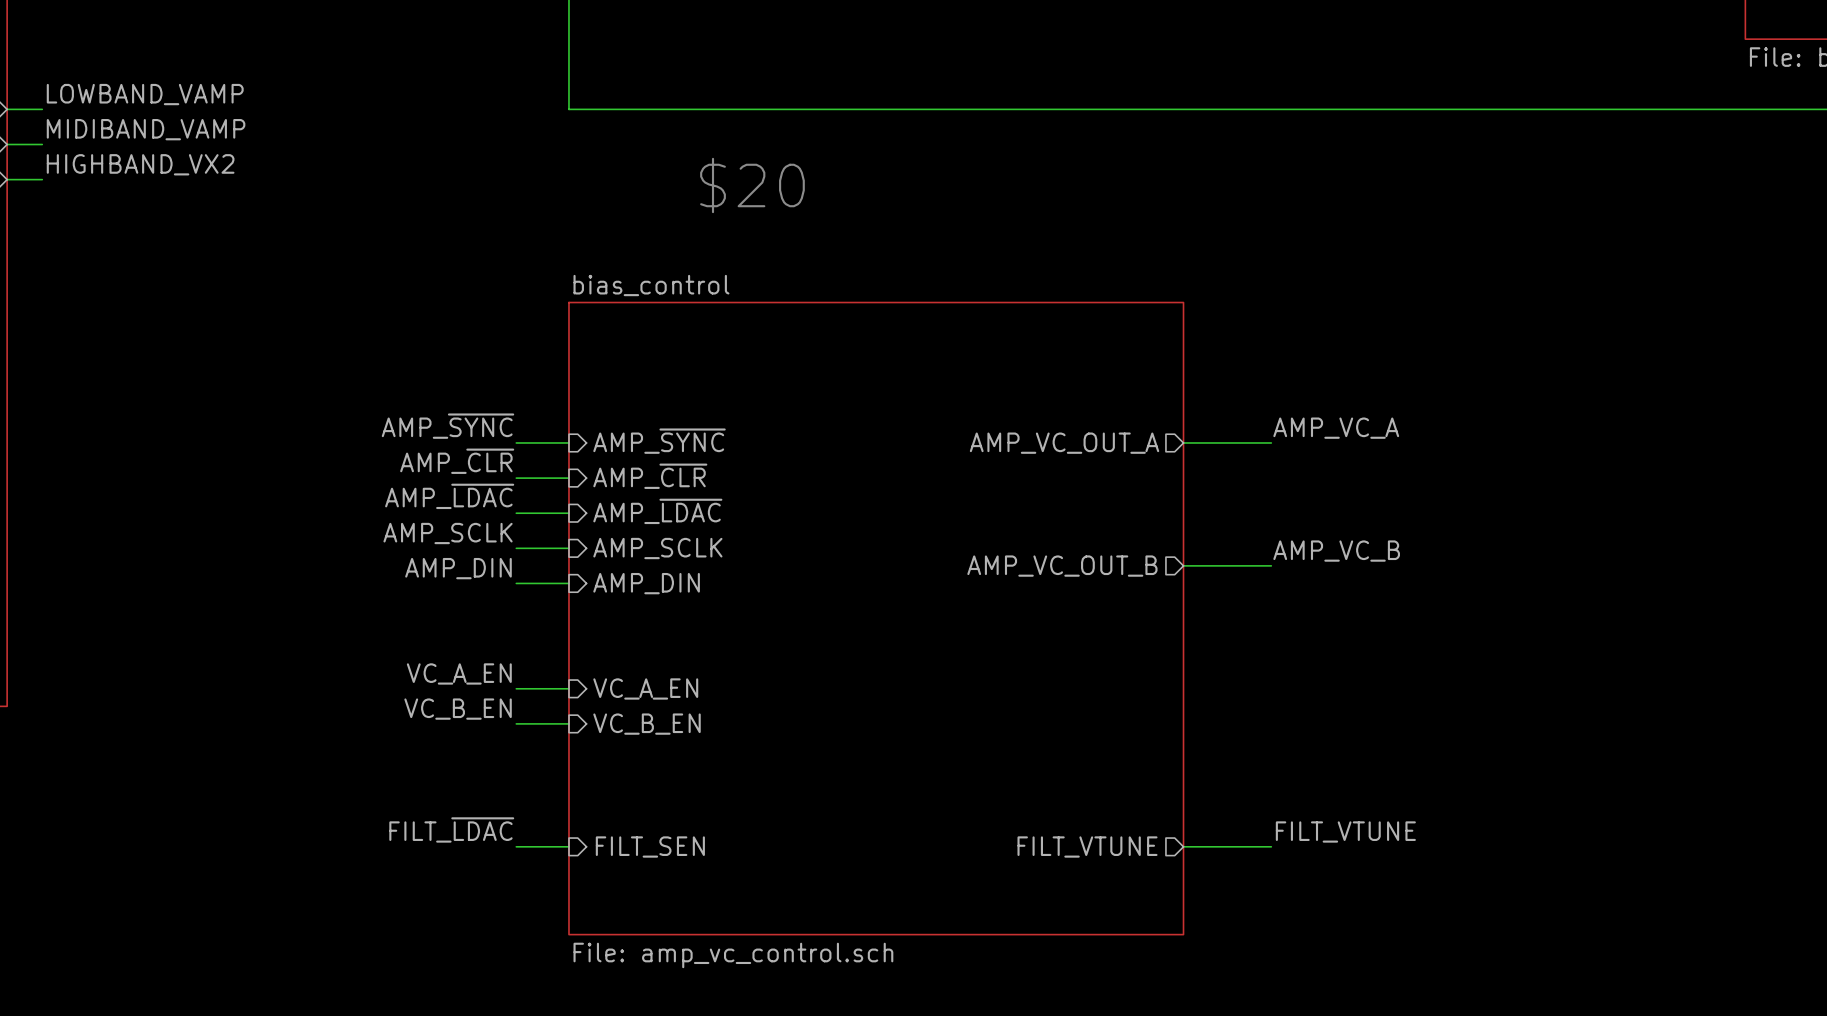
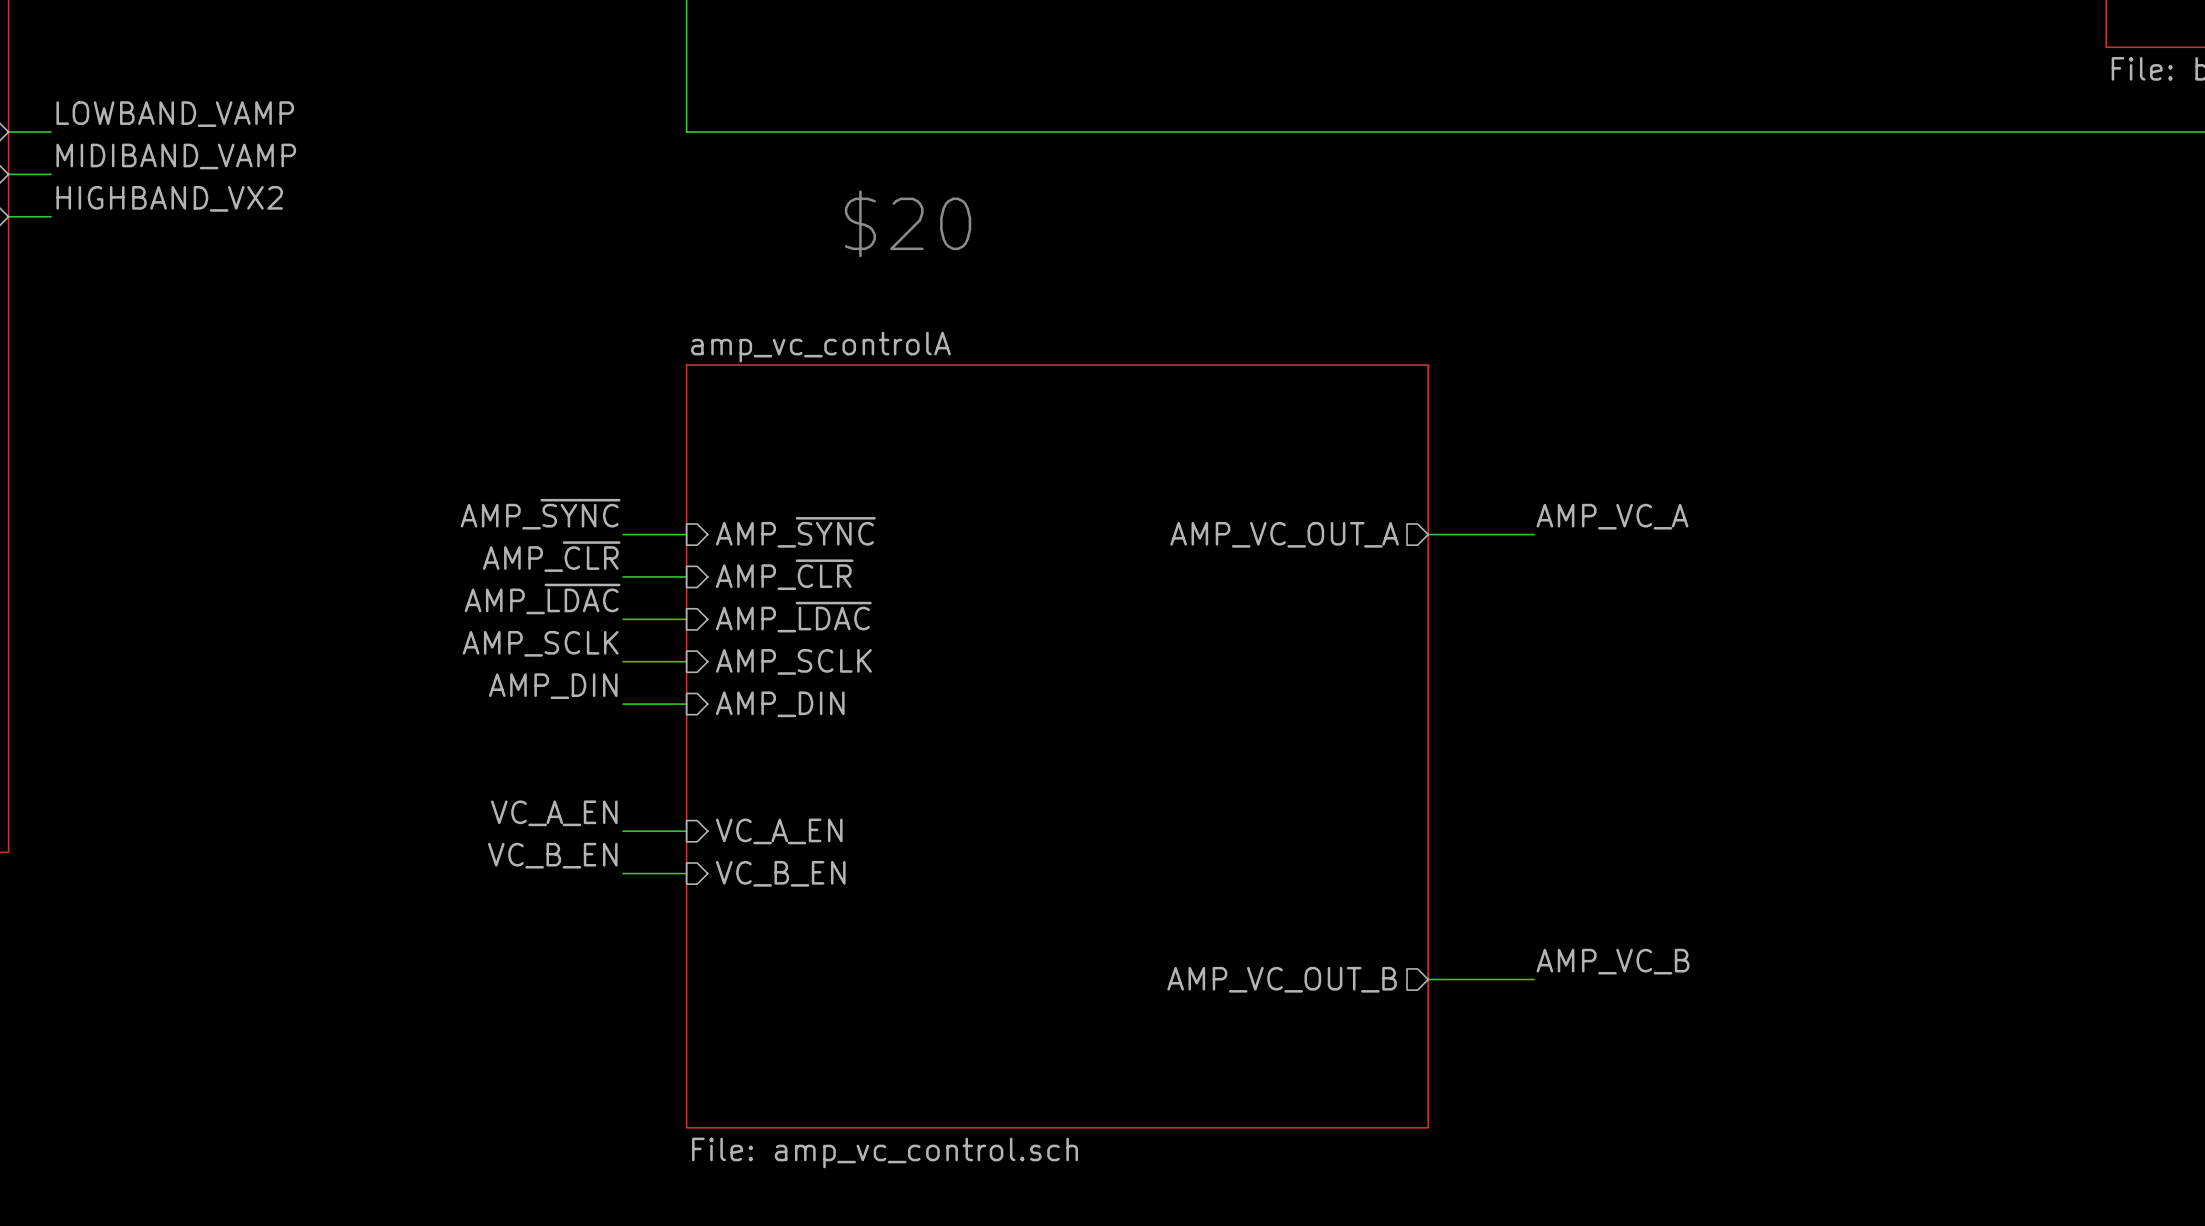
sheet bias_control name: bias_control (651, 285) -> amp_vc_controlA (820, 347)
label position: AMP_VC_B (1336, 551) -> AMP_VC_B (1613, 961)
wire: (1183, 565) (1271, 565) -> none
sheet pin position: AMP_VC_OUT_B (1062, 566) -> AMP_VC_OUT_B (1282, 979)
label: FILT_~{LDAC} (451, 829) -> none
label: FILT_VTUNE (1345, 831) -> none
wire: (516, 846) (568, 846) -> none
wire: (1183, 846) (1271, 846) -> (1428, 979) (1534, 979)
sheet pin: FILT_SEN (650, 847) -> none
sheet pin: FILT_VTUNE (1087, 847) -> none

